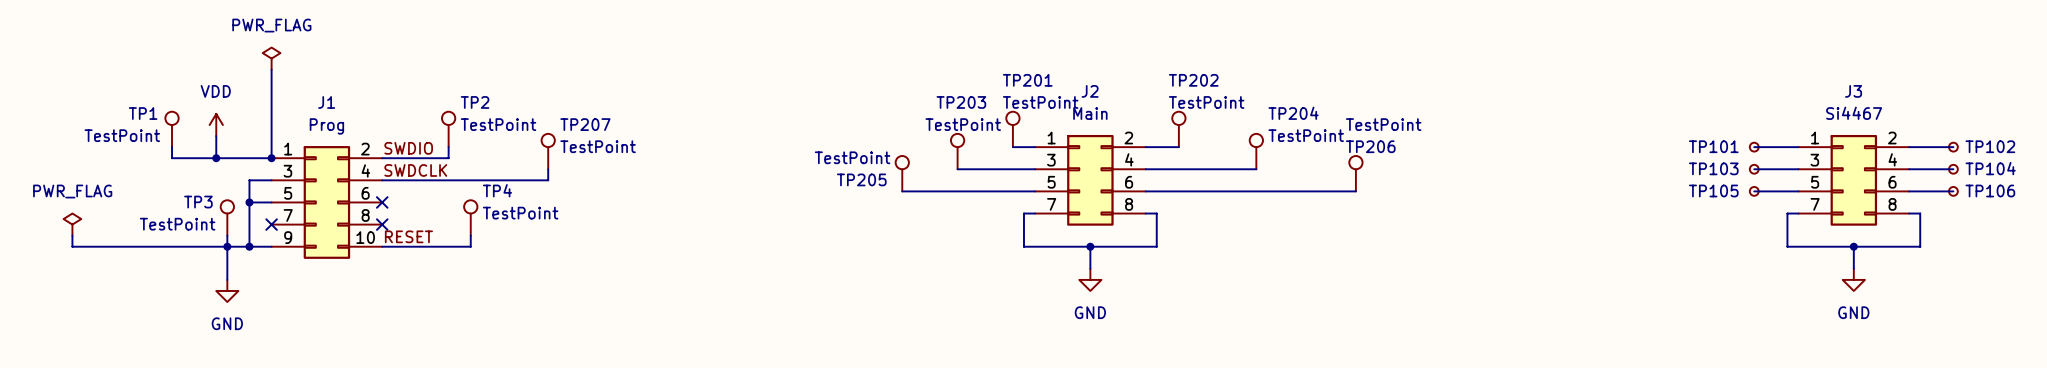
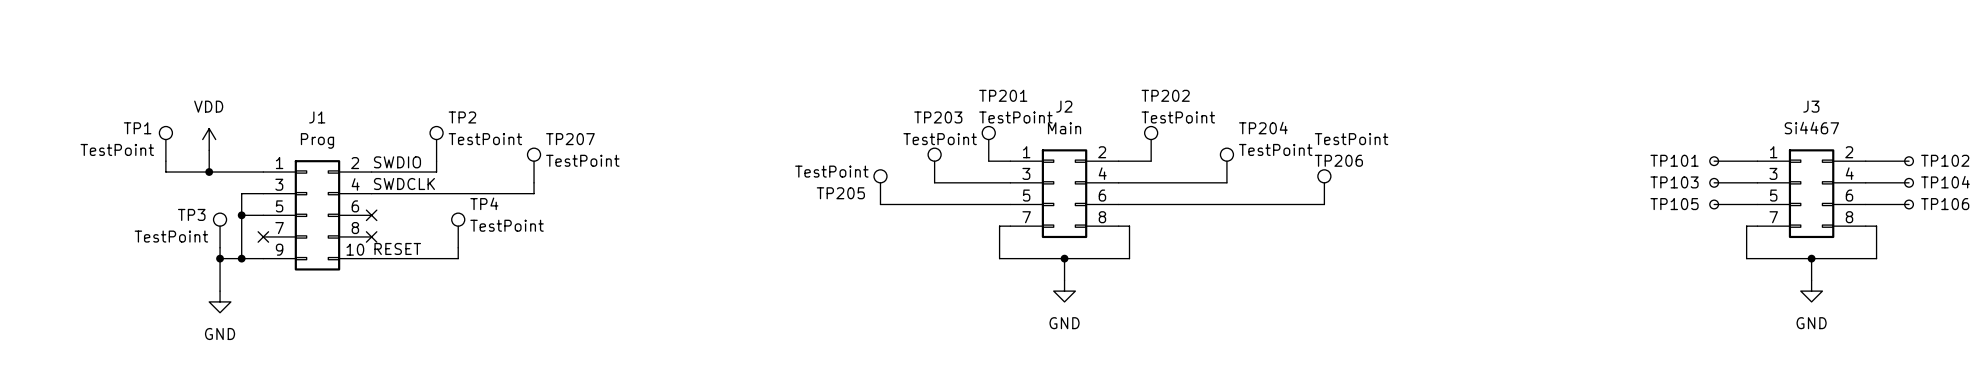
power symbol: PWR_FLAG (271, 58) -> none
wire: (271, 69) (271, 158) -> none
junction: (271, 158) -> none
power symbol: PWR_FLAG (72, 224) -> none
wire: (72, 235) (72, 246) (227, 246) -> none

